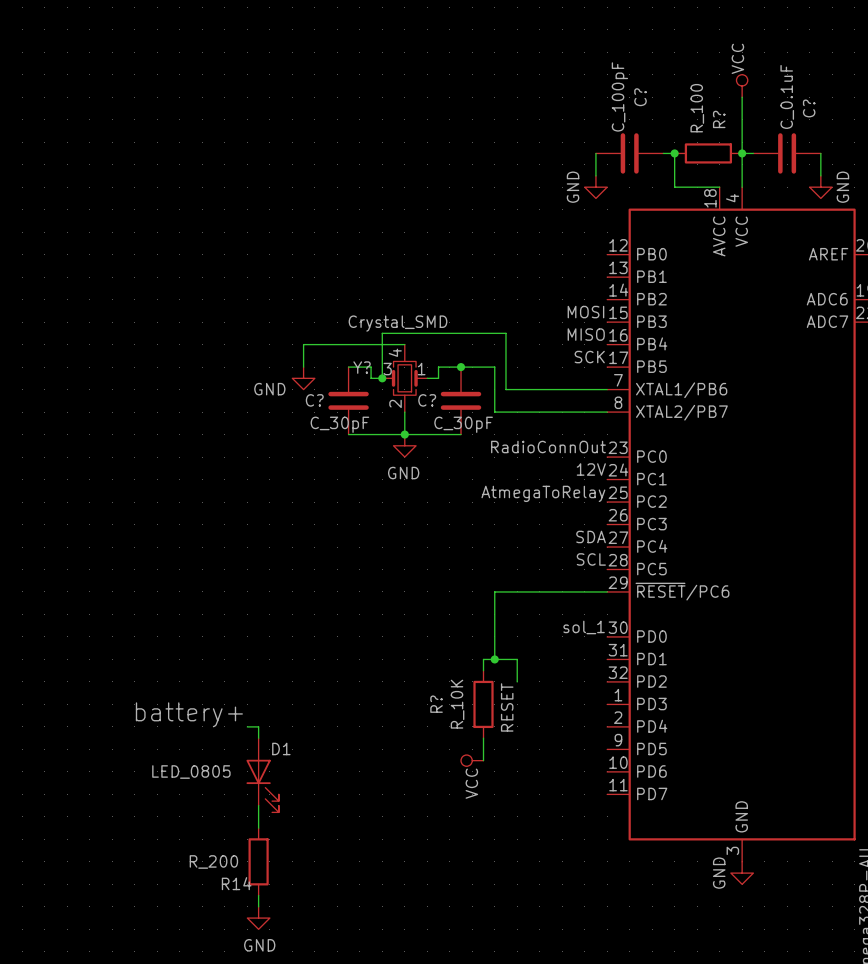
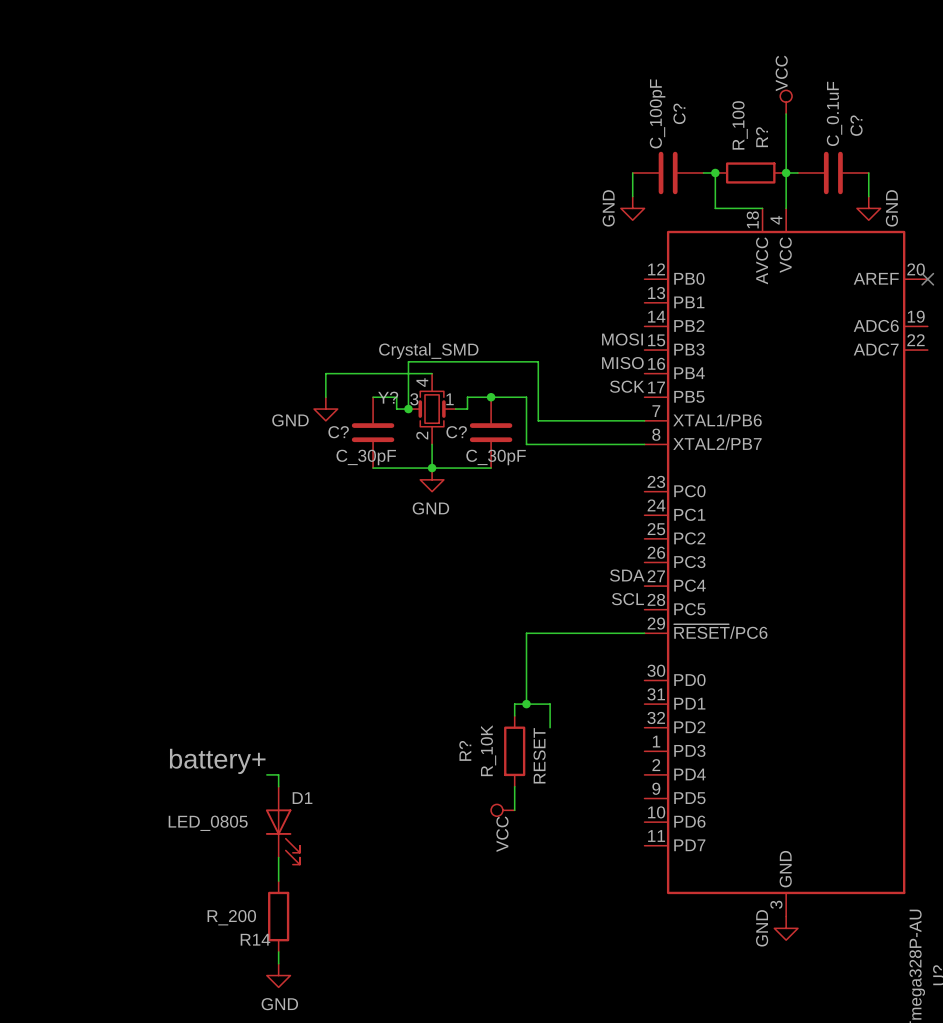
label: RadioConnOut (548, 447) -> none
label: 12V (591, 469) -> none
label: AtmegaToRelay (543, 493) -> none
label: sol_1 (584, 627) -> none

